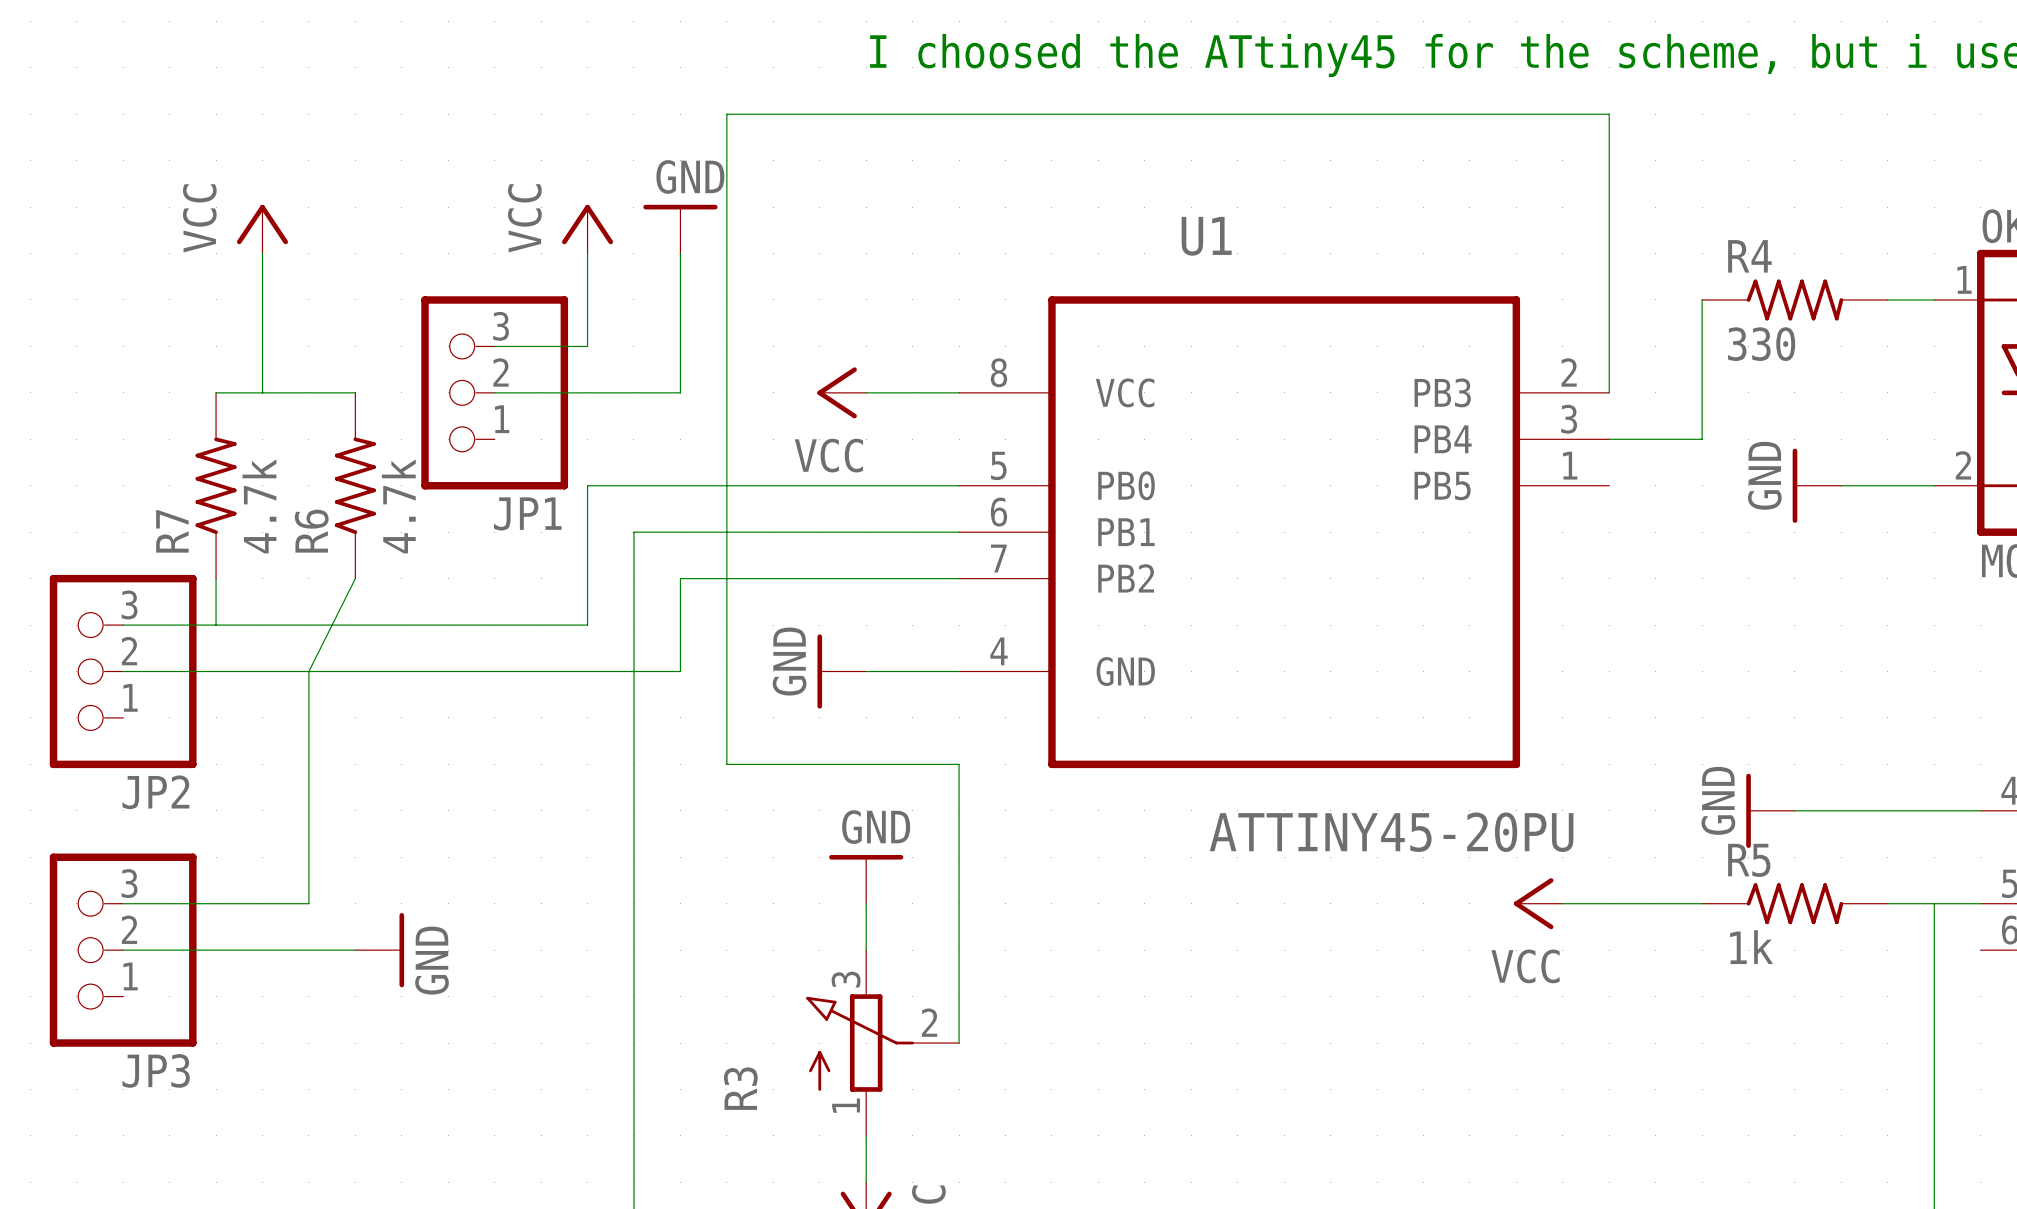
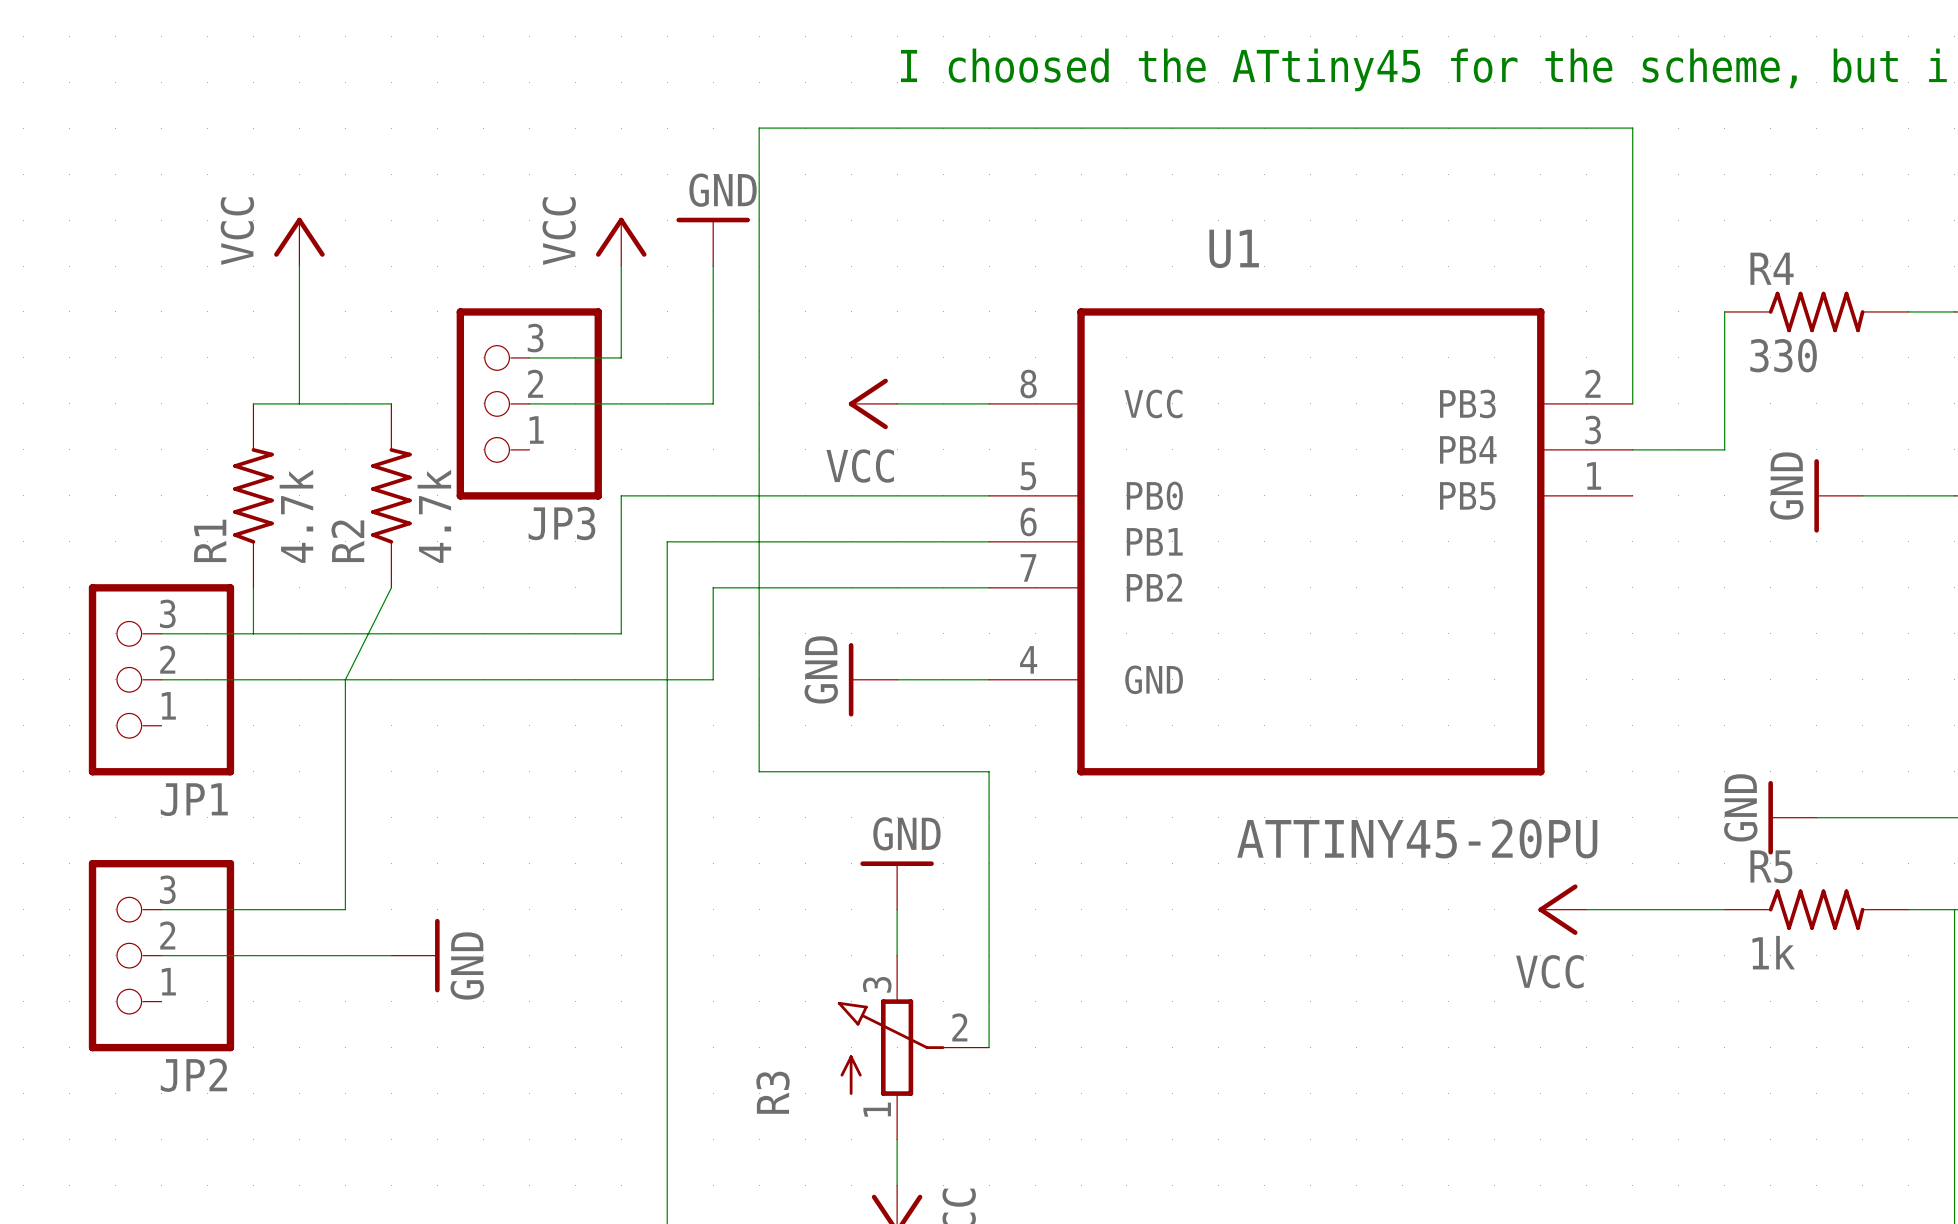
JP1 name: JP1 (527, 513) -> JP3 (561, 523)
R7 name: R7 (172, 531) -> R1 (210, 540)
R6 name: R6 (311, 531) -> R2 (347, 541)
JP2 name: JP2 (155, 792) -> JP1 (194, 799)
JP3 name: JP3 (156, 1070) -> JP2 (193, 1075)

